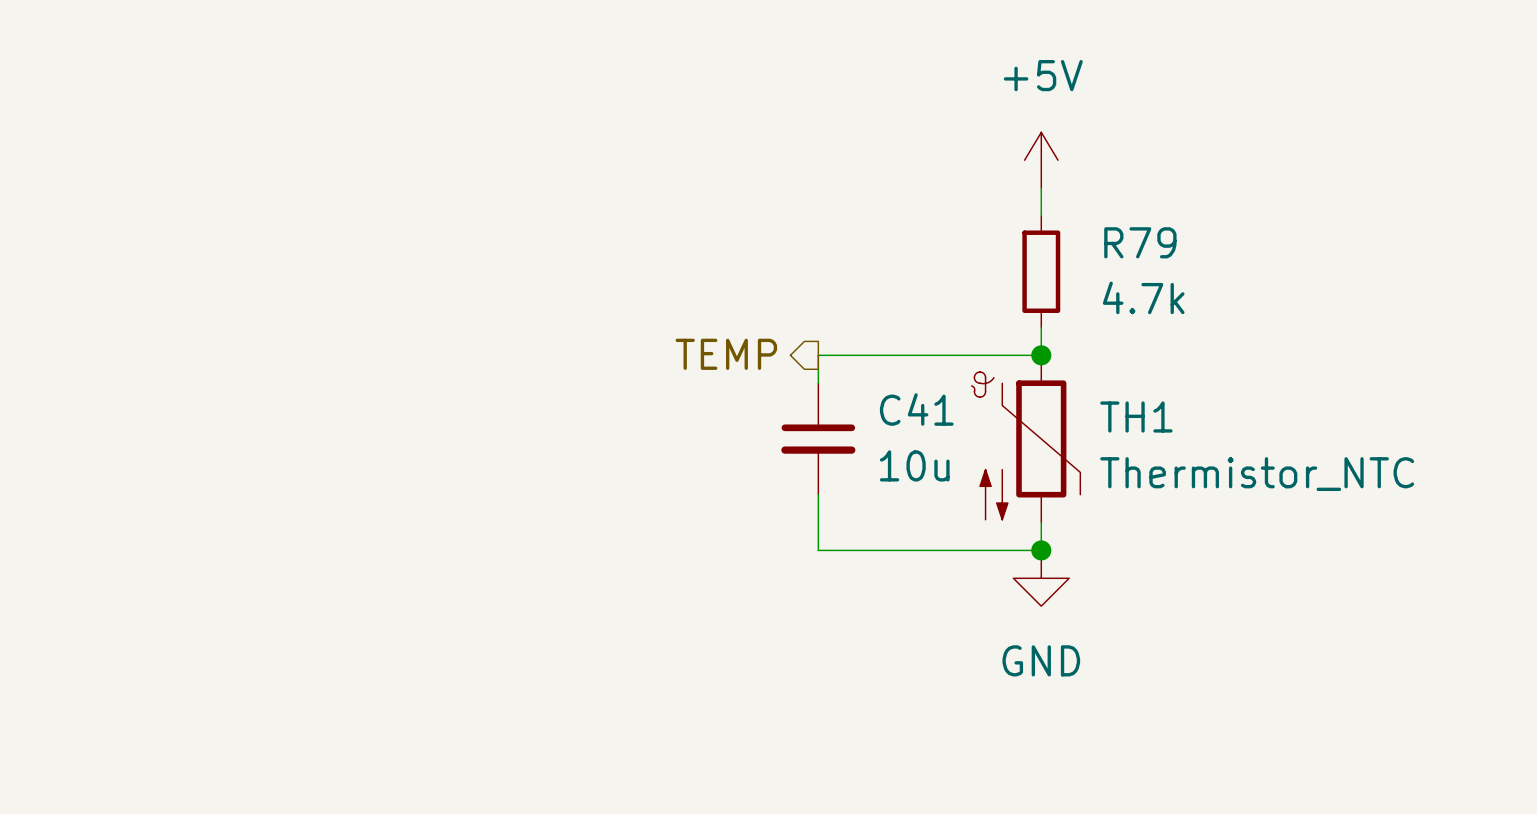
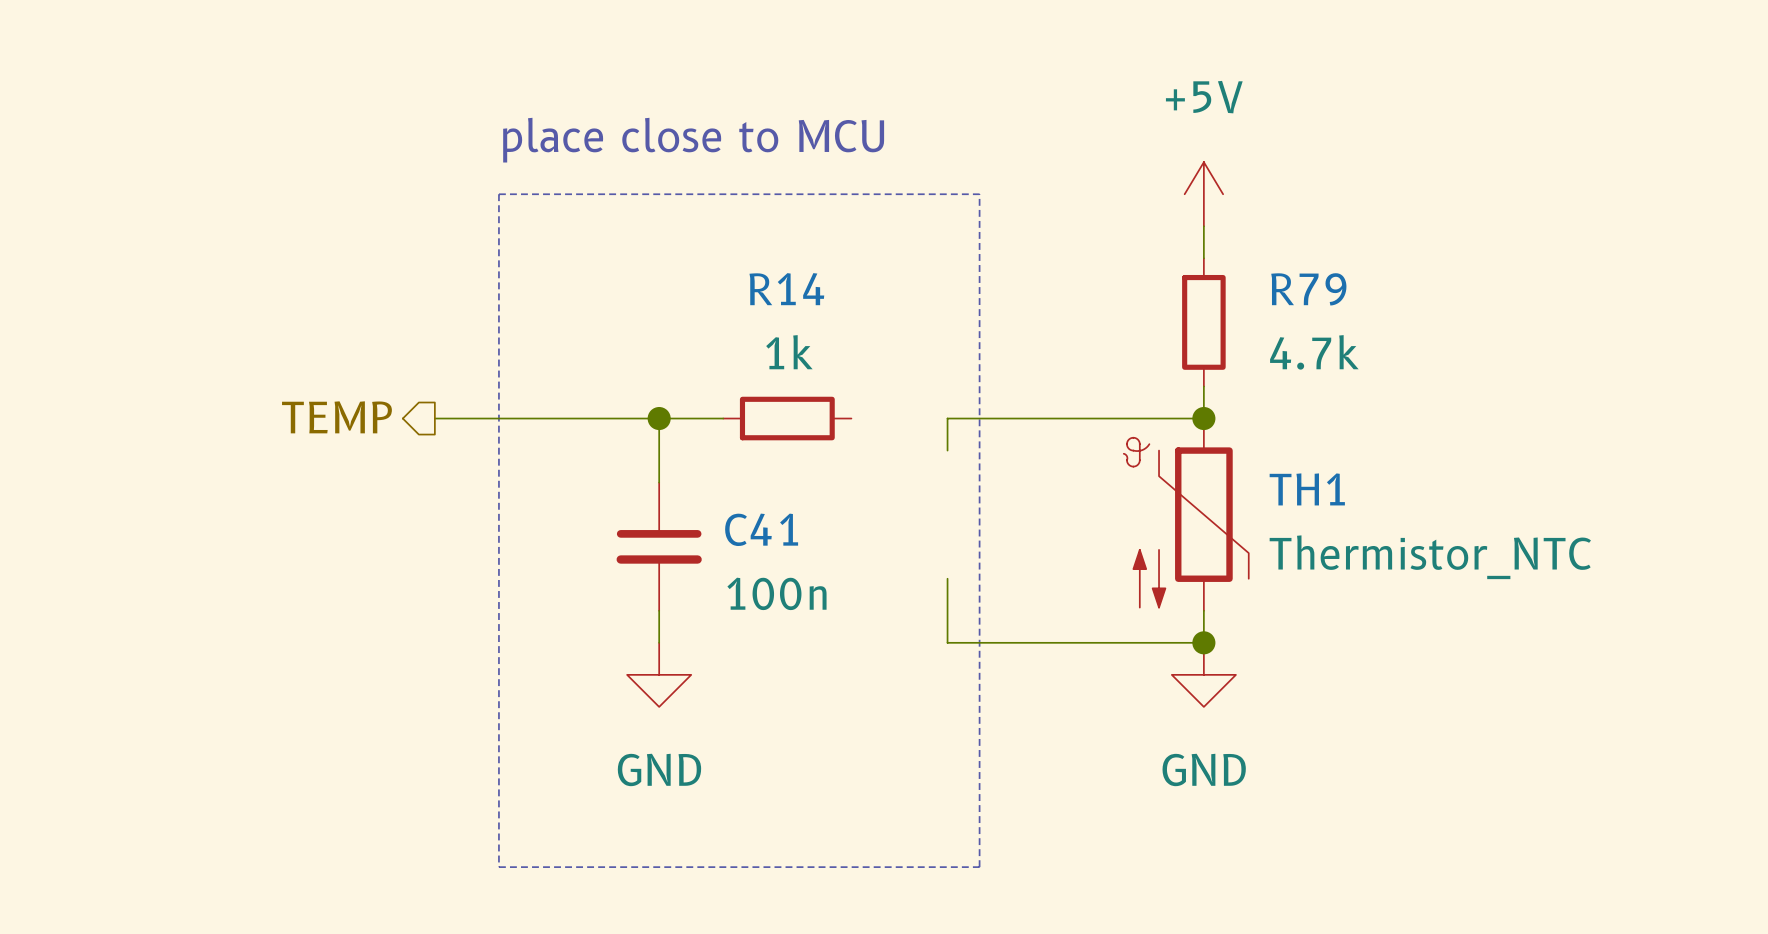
text: none -> place close to MCU (693, 140)
line: none -> (498, 194) (979, 194) (979, 867) (498, 867) (498, 194)
hierarchical label position: TEMP (726, 354) -> TEMP (336, 417)
wire: none -> (434, 418) (723, 418)
wire: none -> (659, 418) (659, 482)
junction: none -> (659, 418)
R14: none -> 1k (787, 418)
C41 name position: C41 (916, 409) -> C41 (761, 529)
C41 position: (818, 438) -> (659, 546)
C41 value: 10u (914, 465) -> 100n (776, 593)
wire: none -> (659, 610) (659, 642)
power symbol: none -> GND (659, 674)

